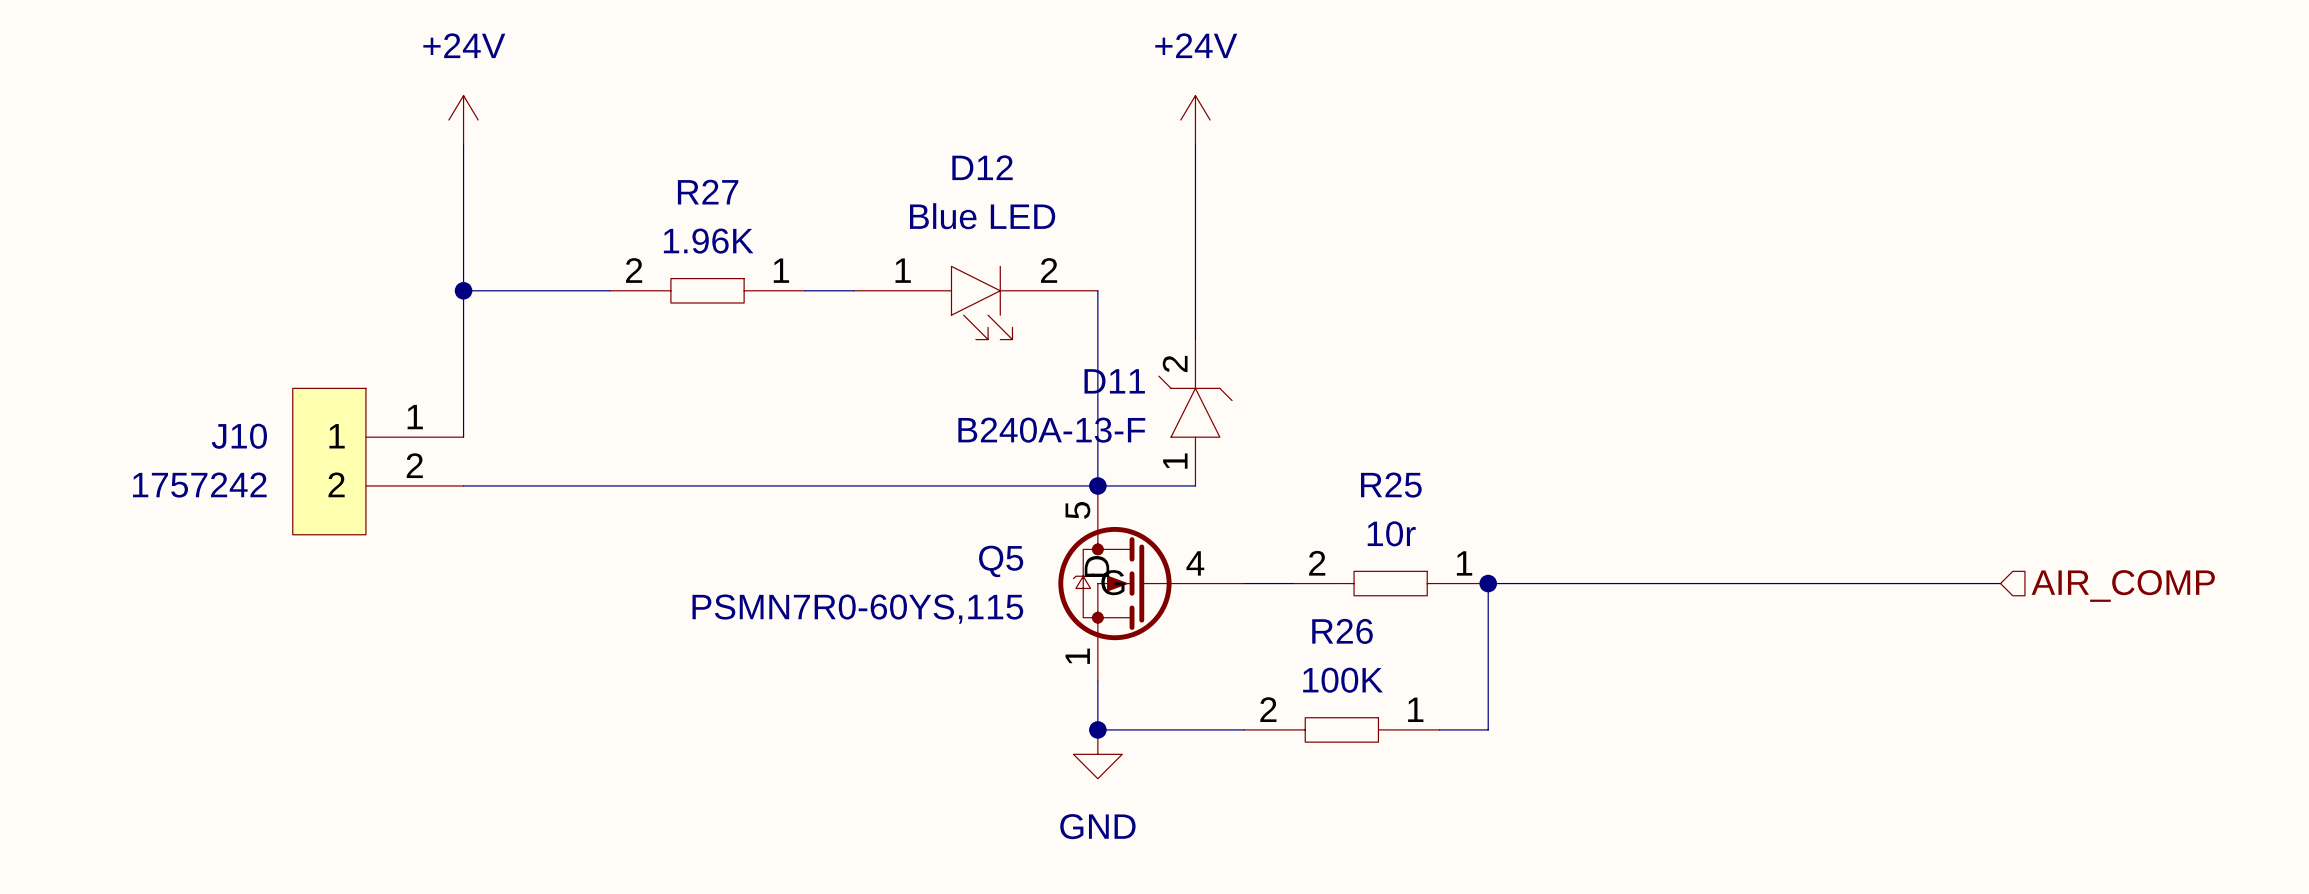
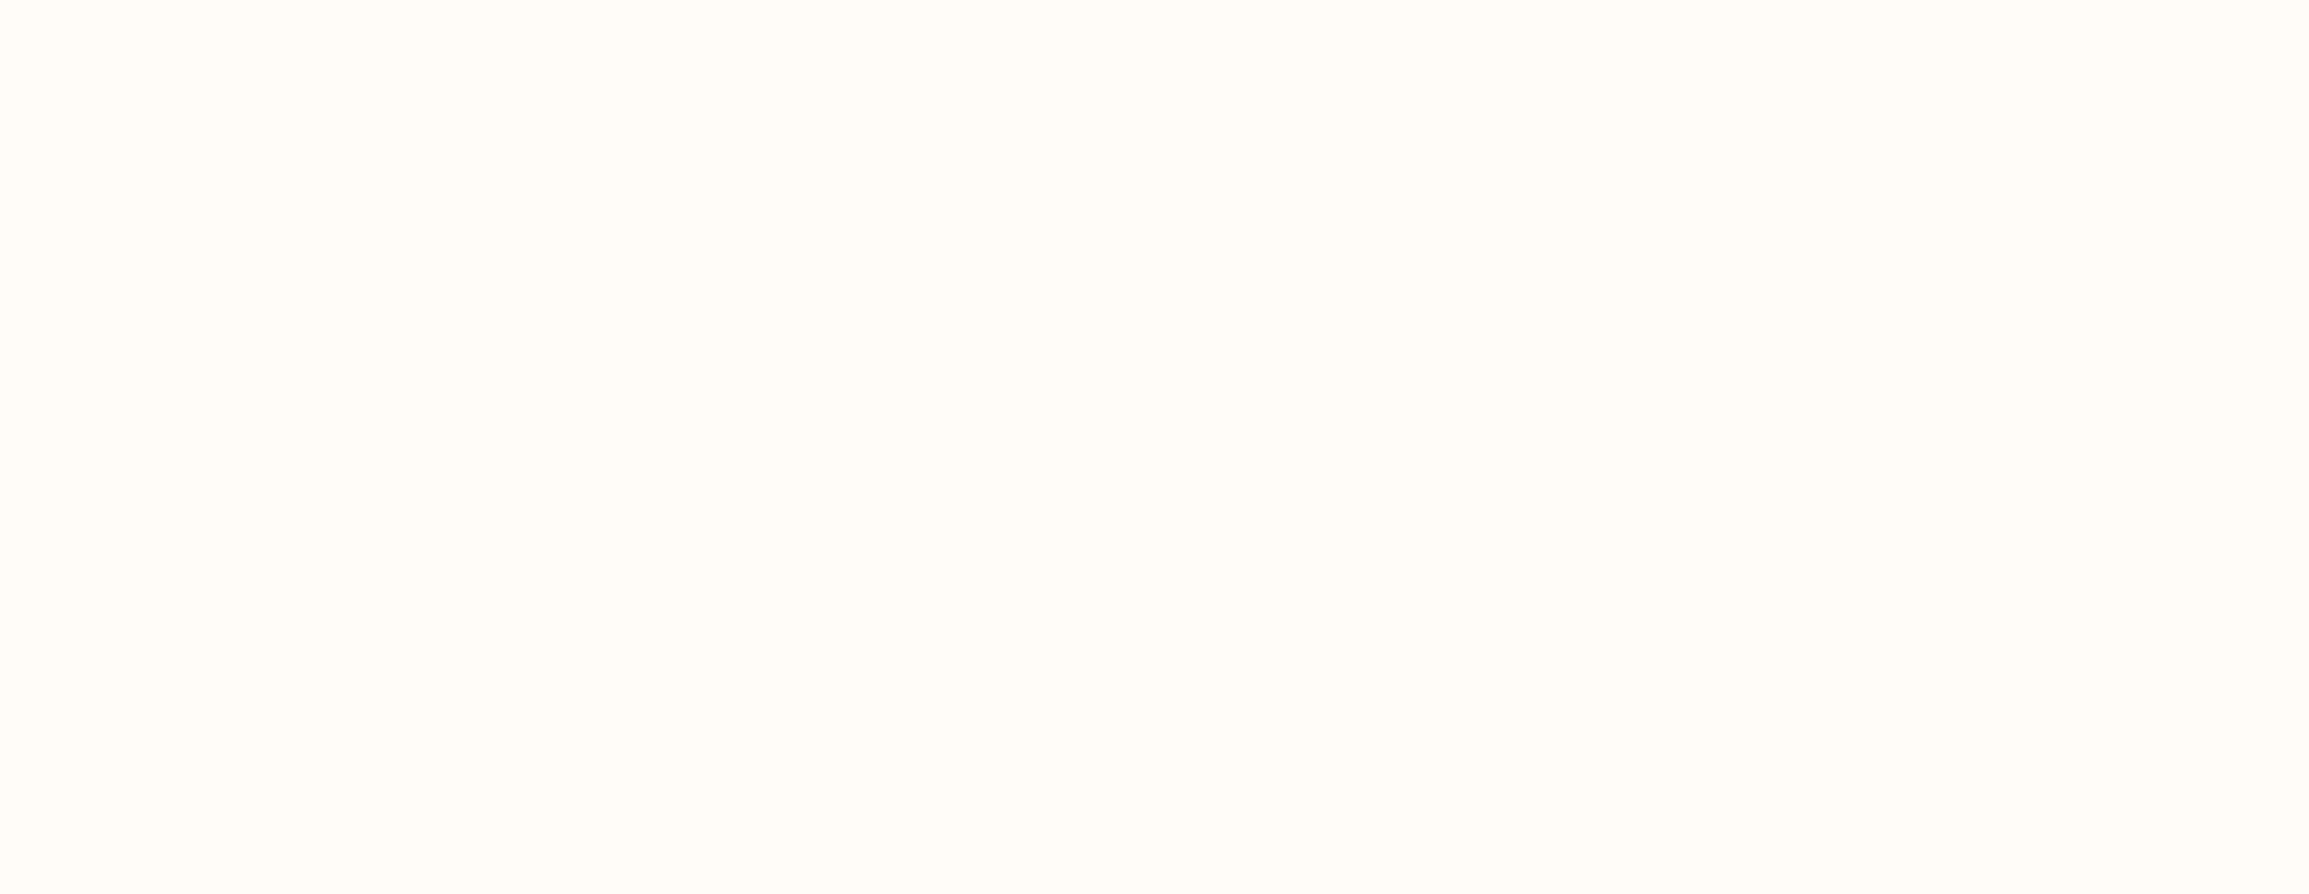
power symbol: +24V (463, 120) -> none
power symbol: +24V (1195, 120) -> none
wire: (463, 144) (463, 437) -> none
wire: (1195, 144) (1195, 339) -> none
wire: (463, 290) (609, 290) -> none
junction: (463, 290) -> none
R27: (707, 290) -> none
wire: (805, 290) (853, 290) -> none
wire: (1097, 290) (1097, 485) -> none
D12: (975, 302) -> none
D11: (1195, 412) -> none
J10: 1757242 (378, 461) -> none
wire: (463, 485) (1195, 485) -> none
junction: (1097, 485) -> none
Q5: (1151, 583) -> none
wire: (1244, 583) (1293, 583) -> none
R25: (1390, 583) -> none
junction: (1488, 583) -> none
wire: (2000, 583) (1488, 583) (1488, 729) (1439, 729) -> none
hierarchical label: AIR_COMP (2123, 585) -> none
wire: (1097, 681) (1097, 729) (1244, 729) -> none
junction: (1097, 729) -> none
R26: (1341, 729) -> none
power symbol: GND (1097, 754) -> none

